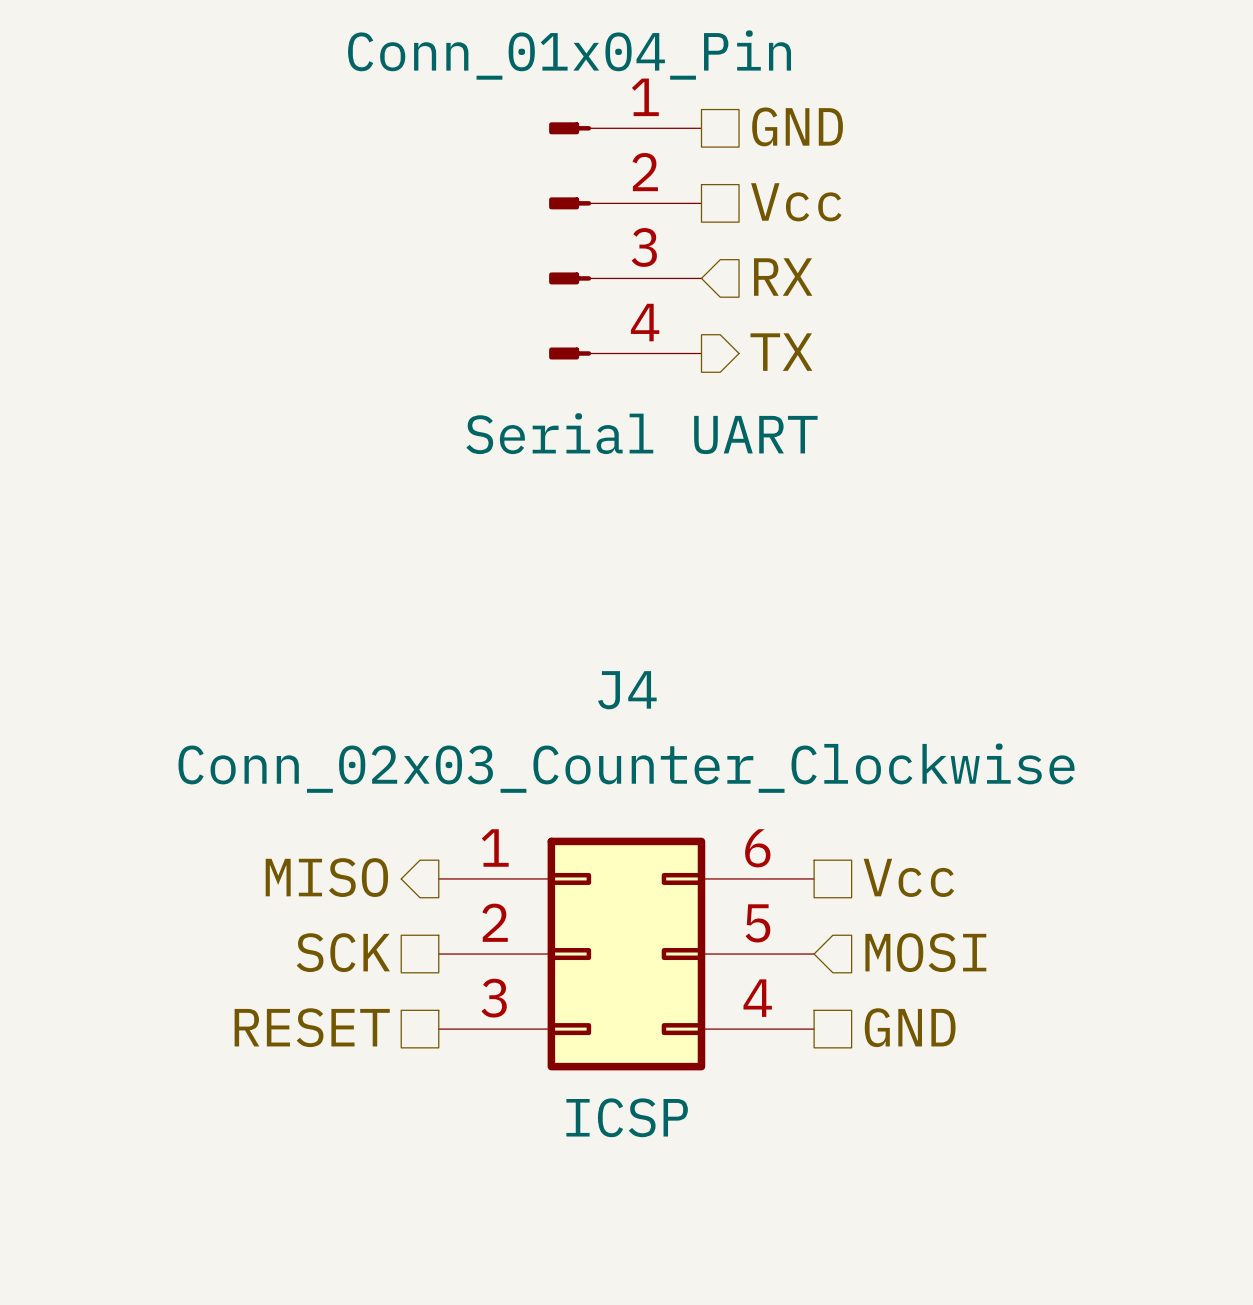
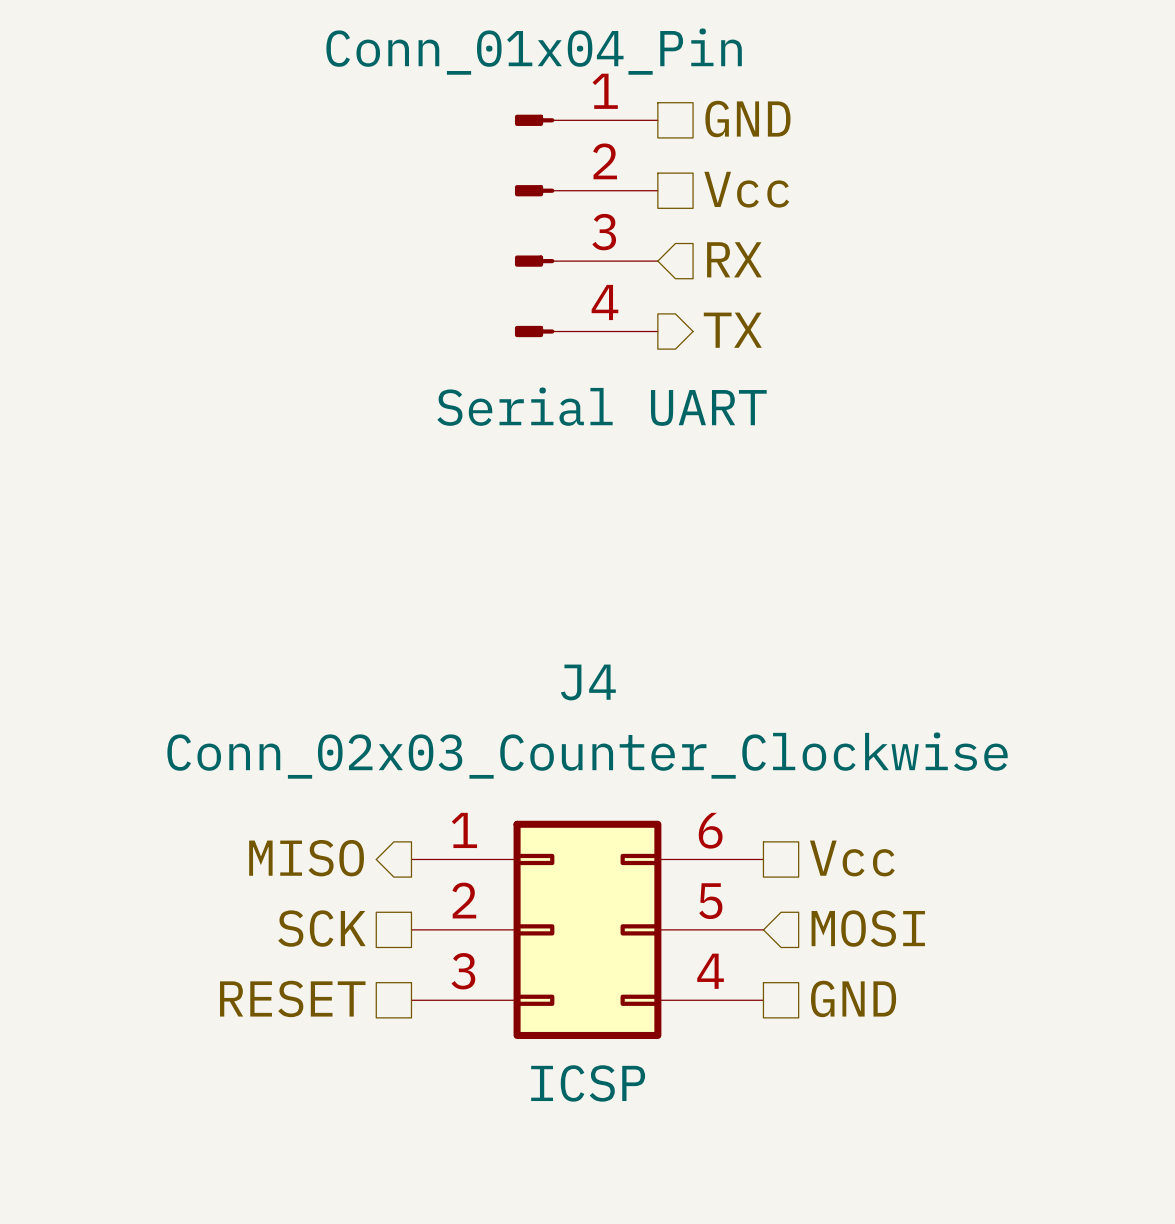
hierarchical label position: MISO (326, 877) -> MISO (306, 858)
hierarchical label position: Vcc (908, 877) -> Vcc (852, 858)
hierarchical label position: SCK (343, 952) -> SCK (321, 928)
hierarchical label position: MOSI (925, 952) -> MOSI (868, 928)
J4 position: (626, 954) -> (587, 929)
hierarchical label position: RESET (312, 1027) -> RESET (292, 998)
hierarchical label position: GND (910, 1027) -> GND (853, 998)

